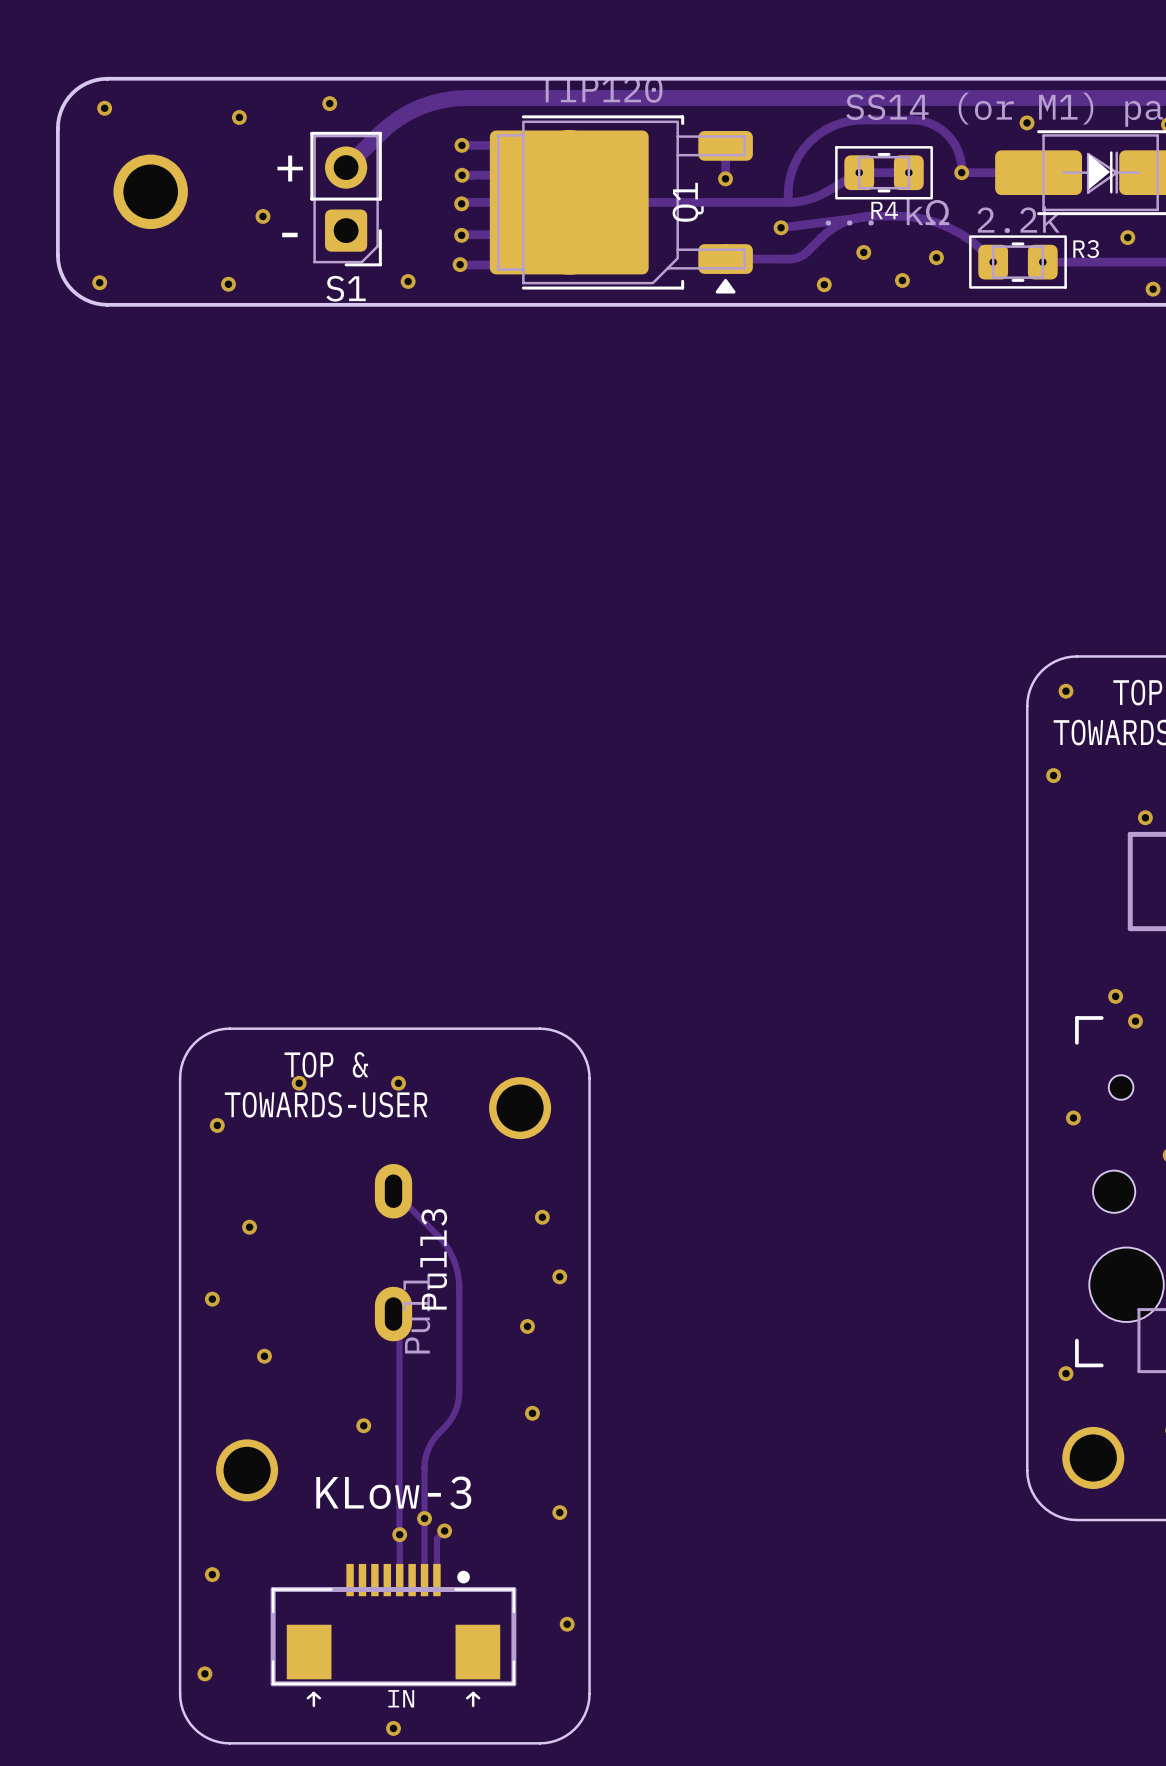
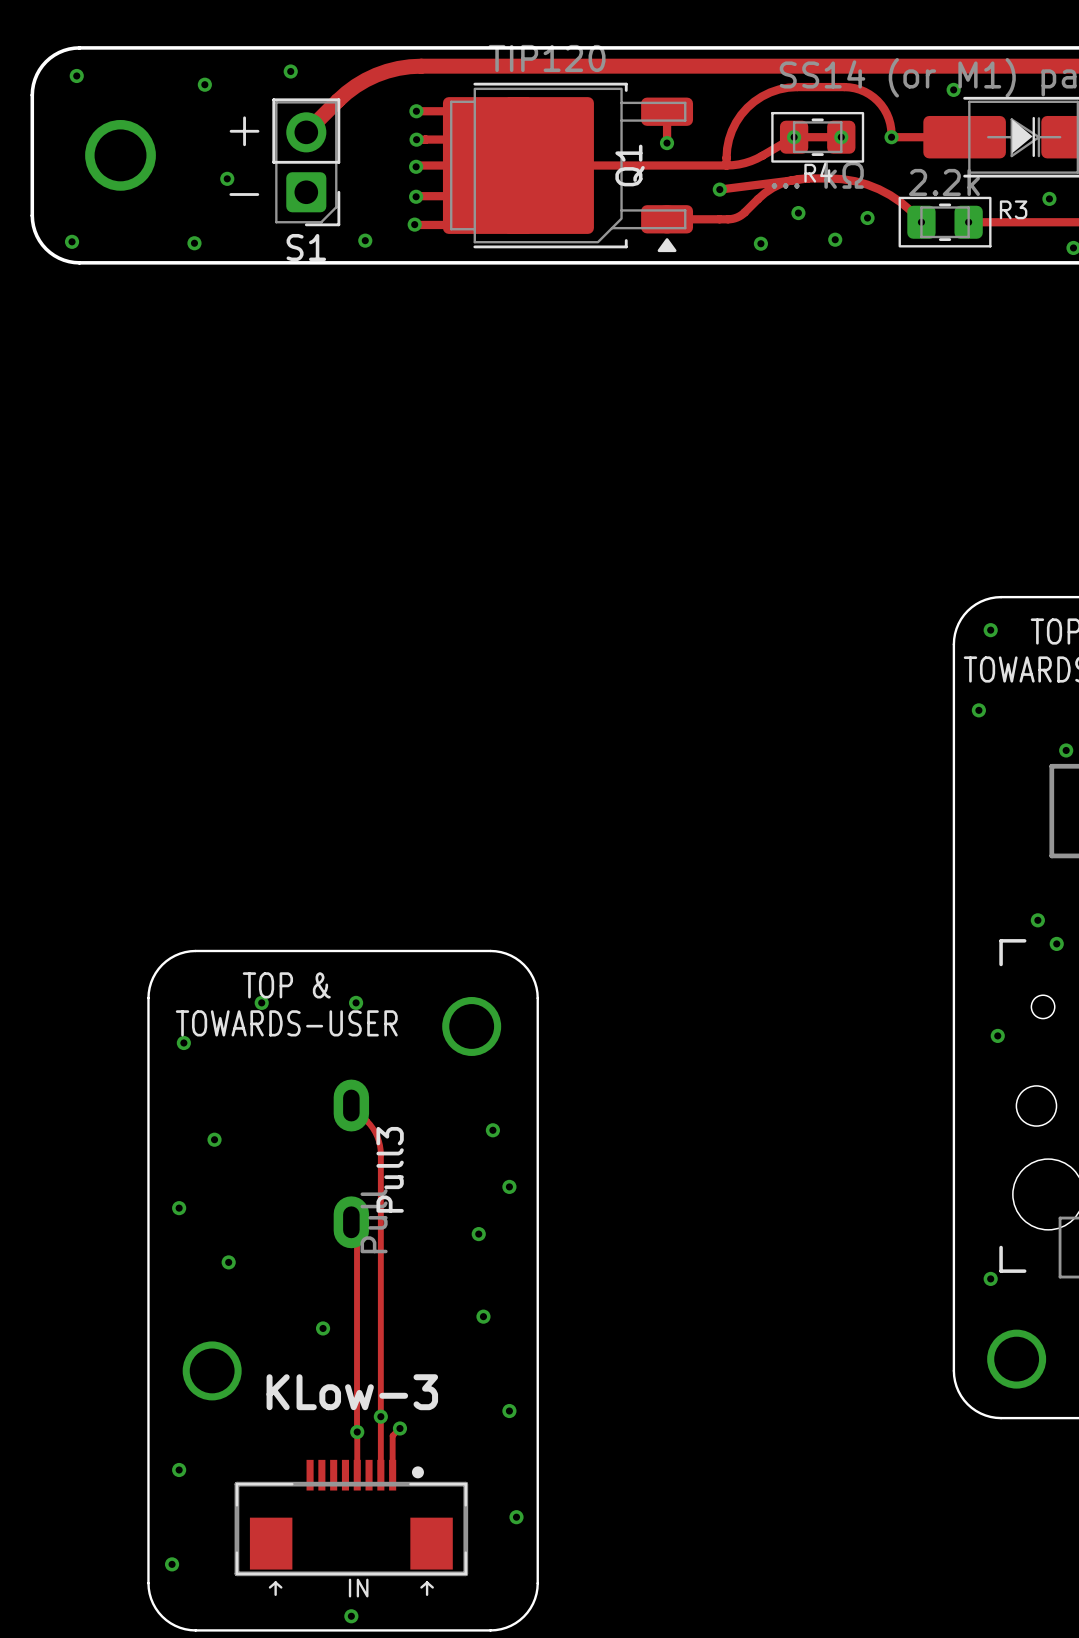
track: (409, 1207) (446, 1246) (456, 1266) (458, 1280) (458, 1398) (452, 1417) (430, 1444) (424, 1468) -> (367, 1121) (377, 1136) (380, 1149) (380, 1368)

